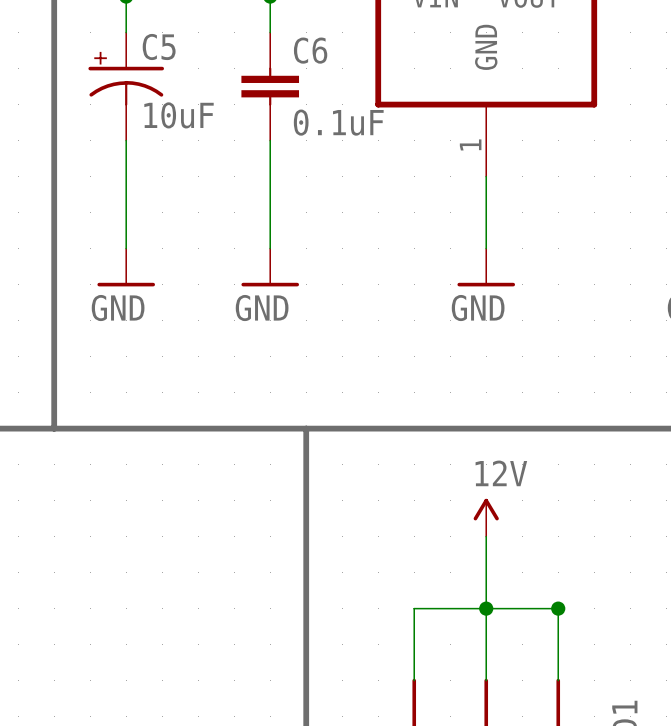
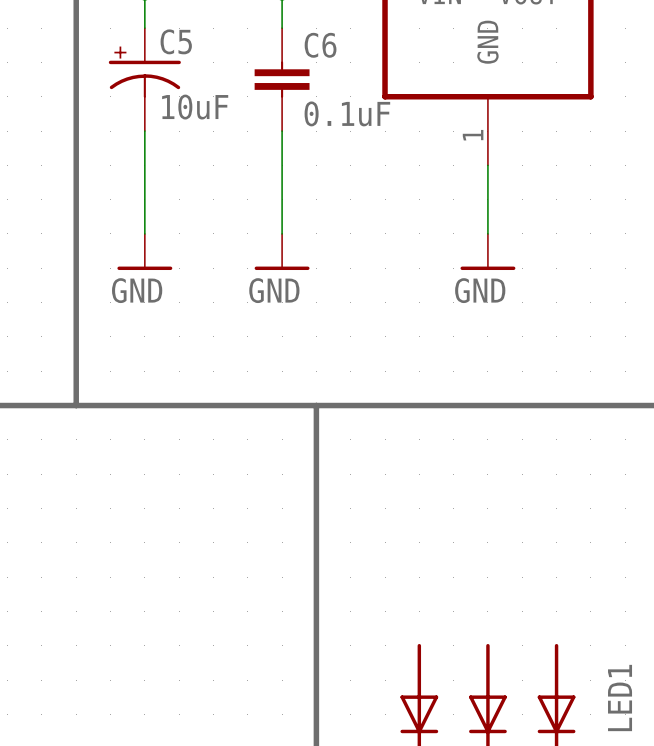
power symbol: 12V (486, 517) -> none
wire: (486, 536) (486, 680) -> none
junction: (486, 608) -> none
junction: (558, 608) -> none
wire: (414, 680) (414, 608) (558, 608) (558, 680) -> none

